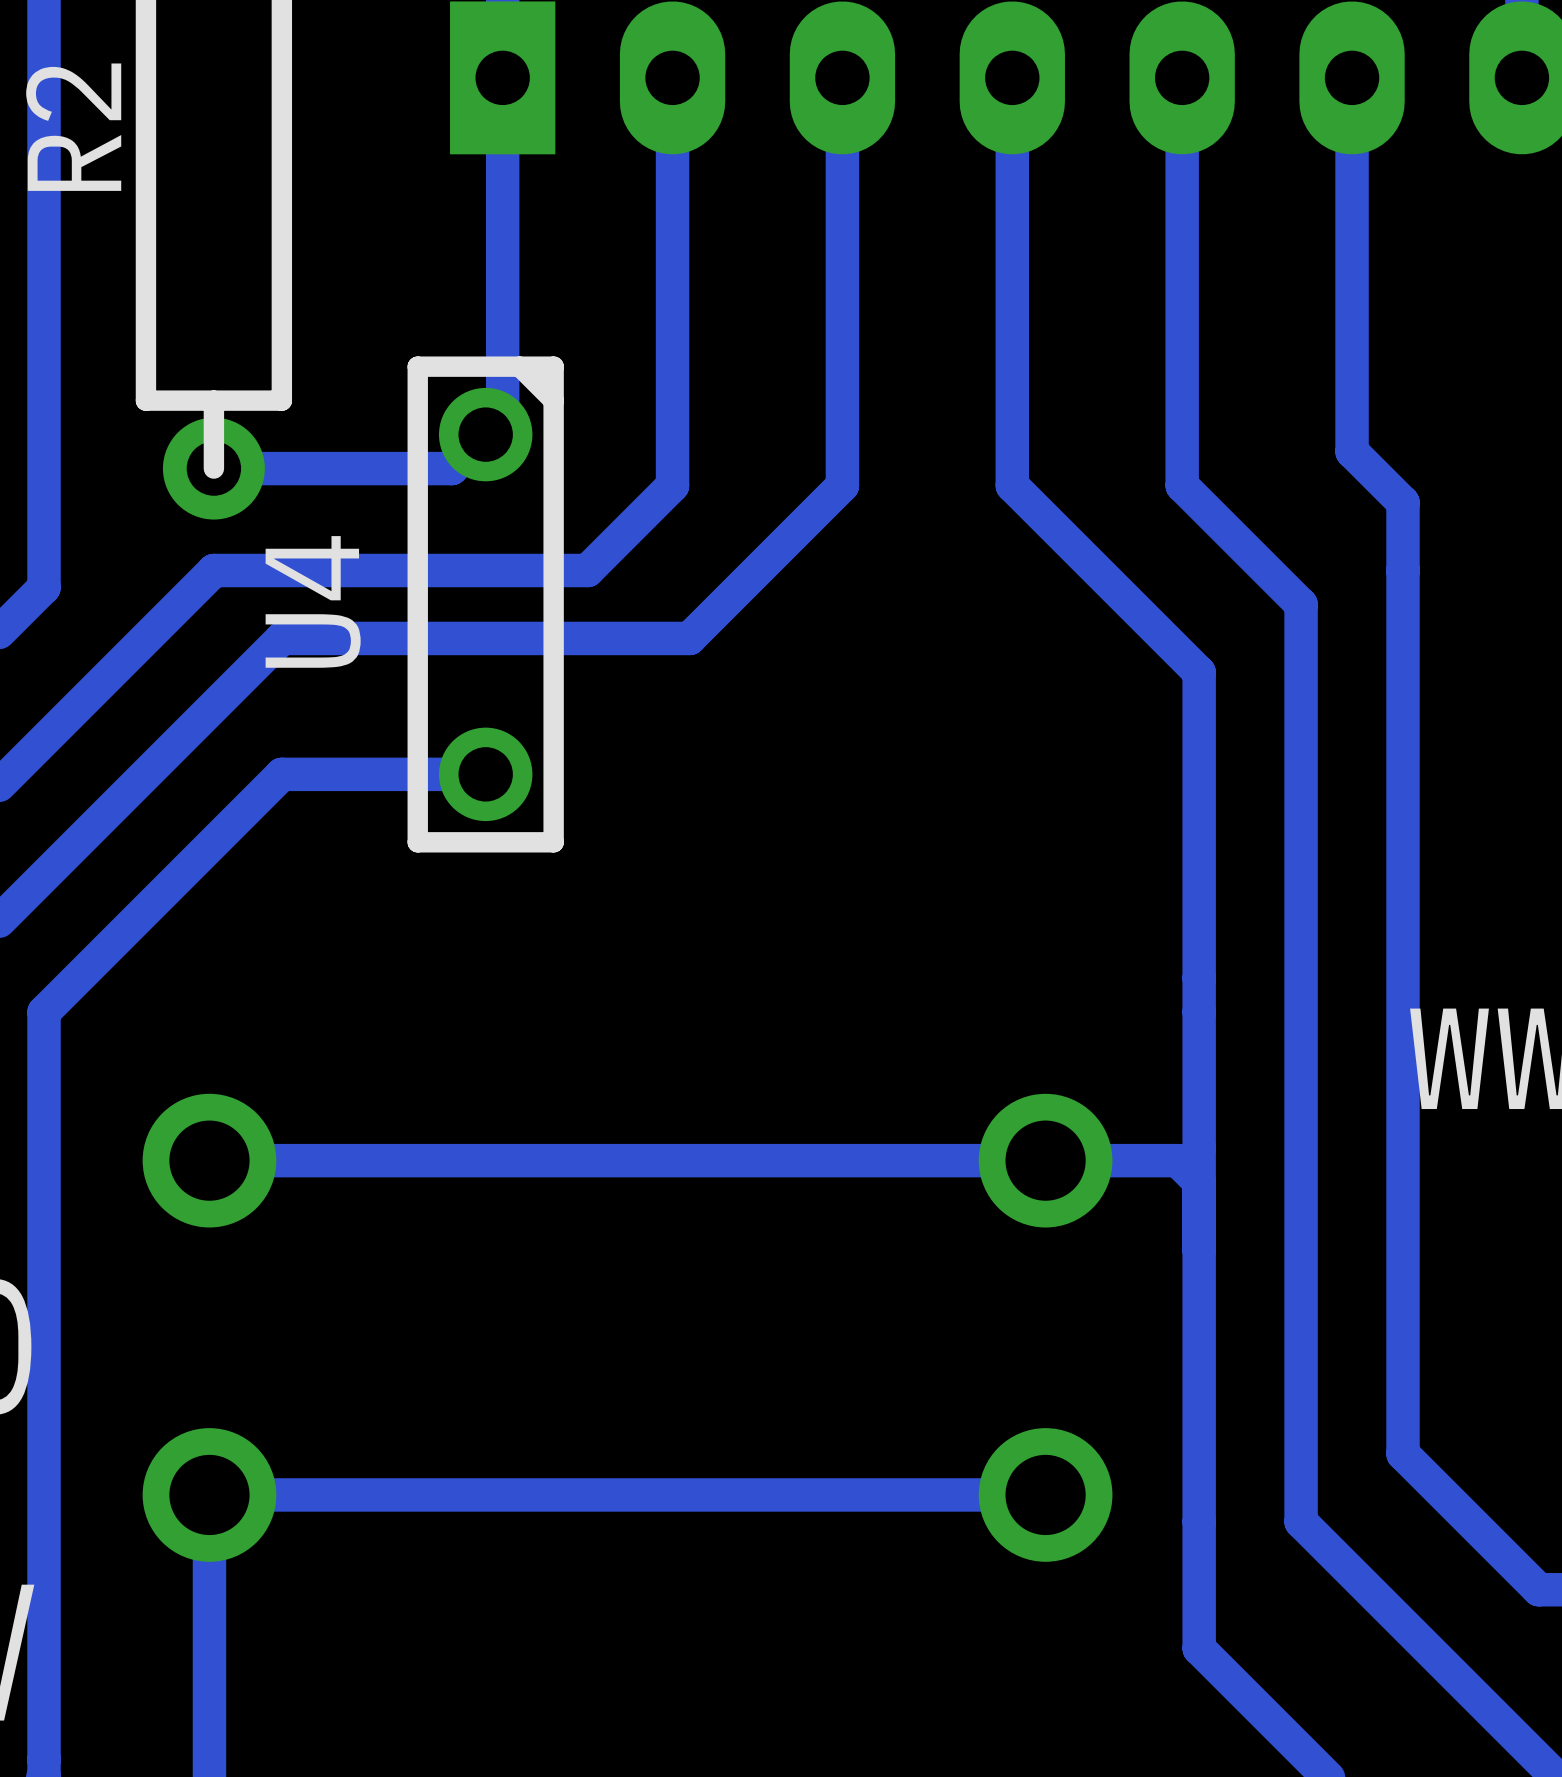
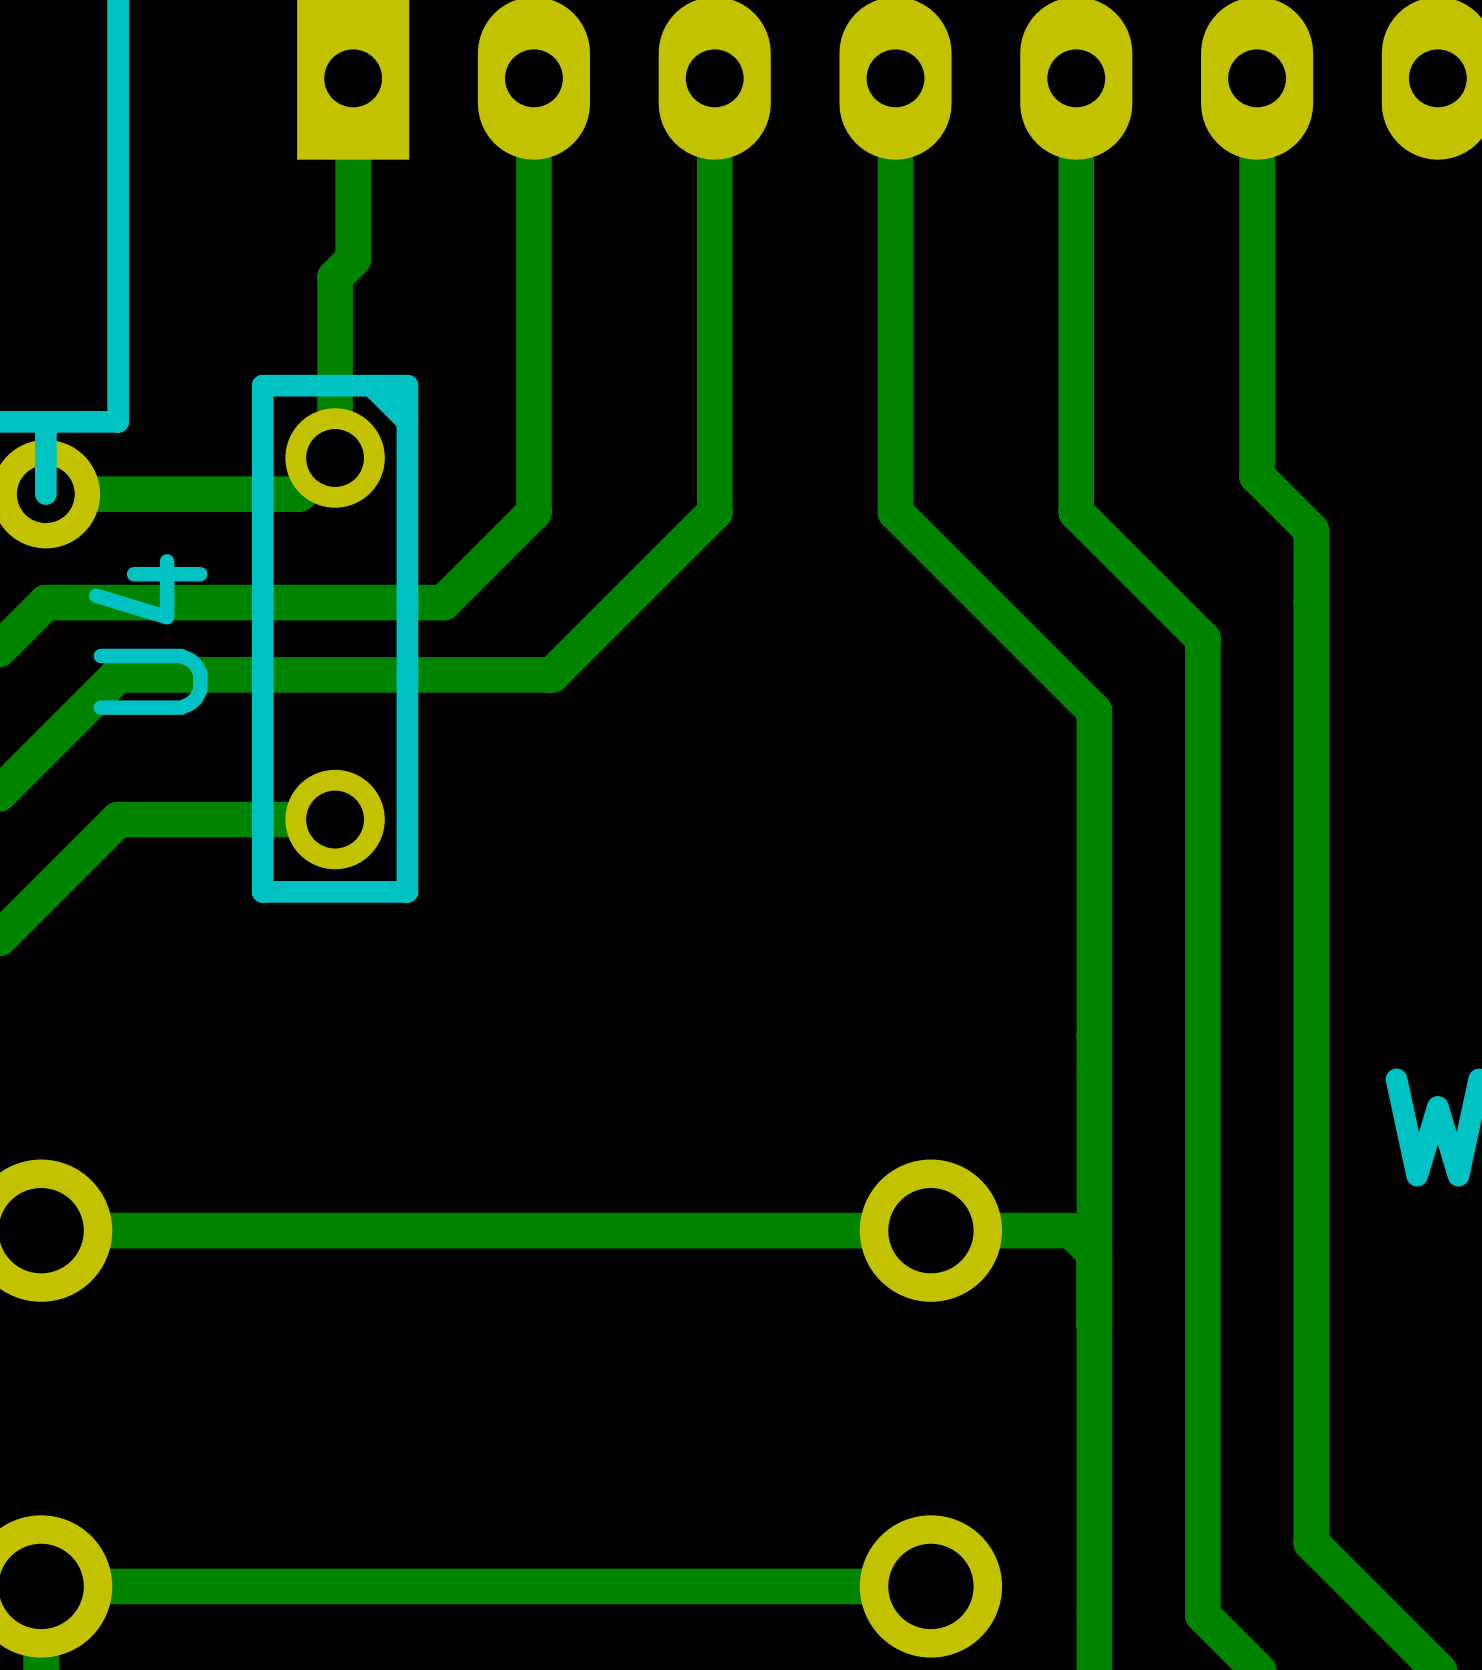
bottom track: (502, 247) (502, 417) (485, 434) -> (353, 259) (335, 277) (335, 457)

